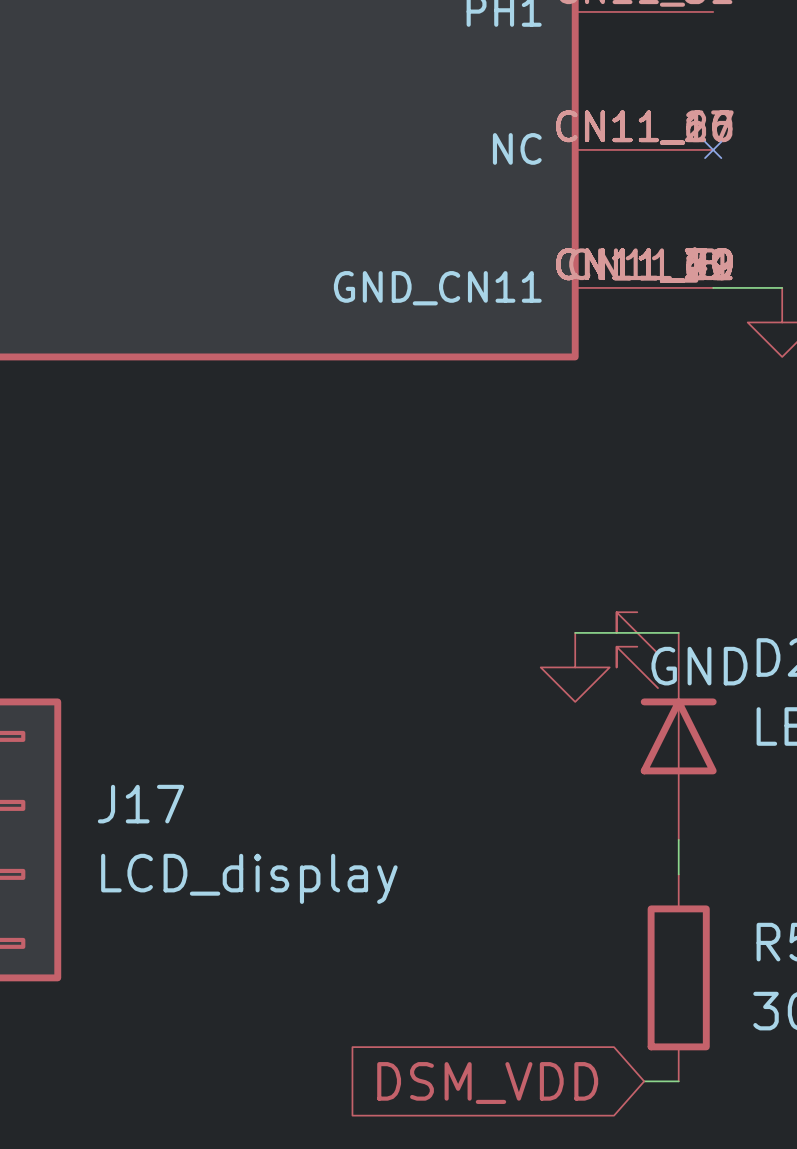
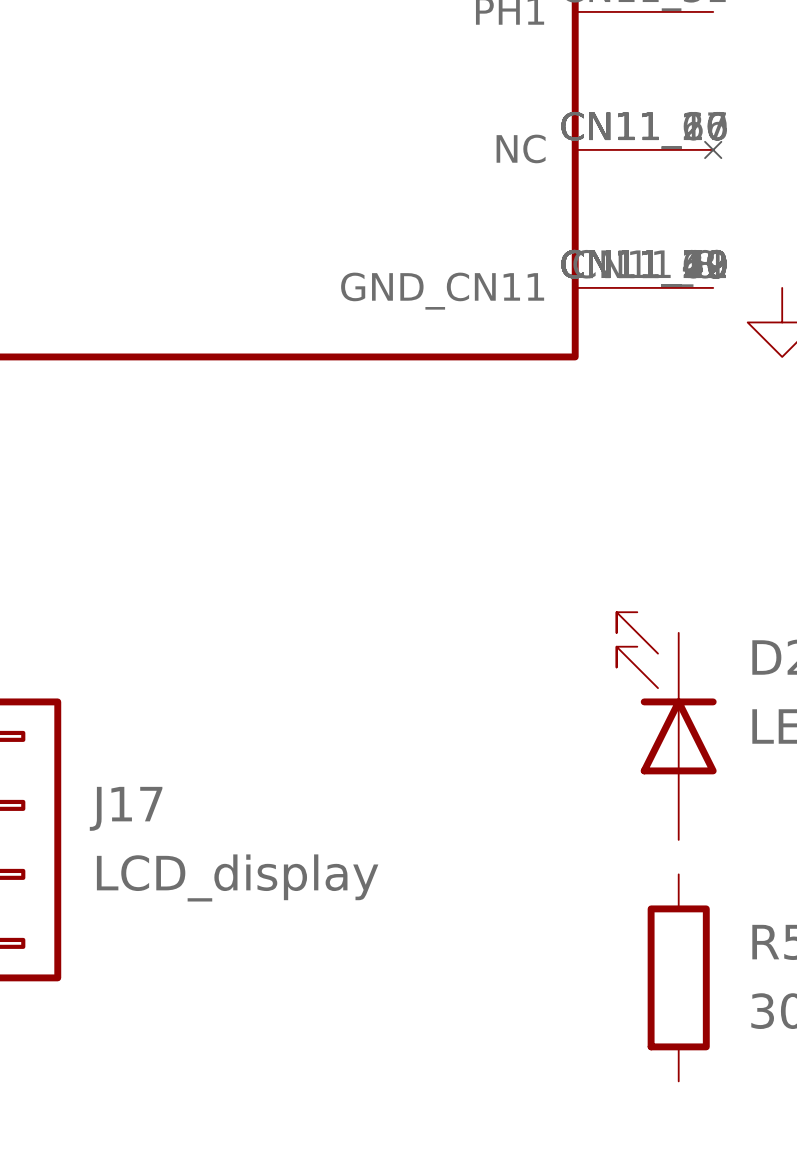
wire: (713, 287) (782, 287) -> none
wire: (575, 632) (678, 632) -> none
power symbol: GND (575, 667) -> none
wire: (678, 839) (678, 874) -> none
wire: (644, 1081) (678, 1081) -> none
global label: DSM_VDD (487, 1083) -> none

